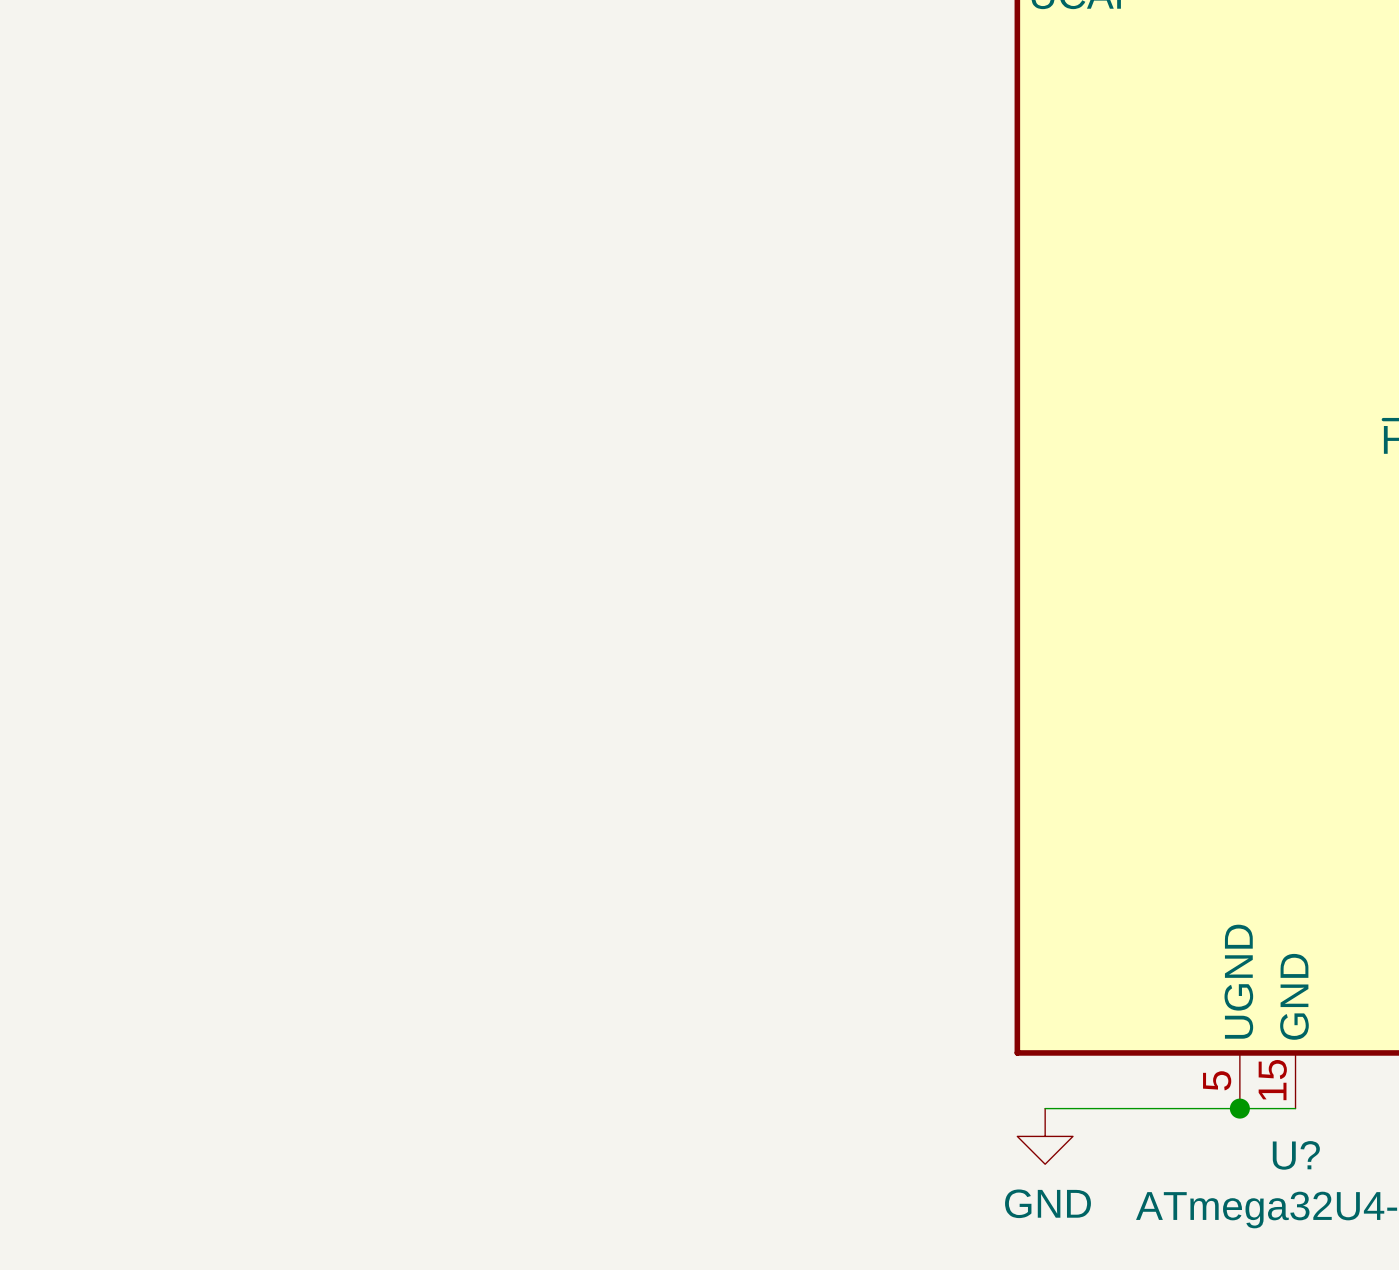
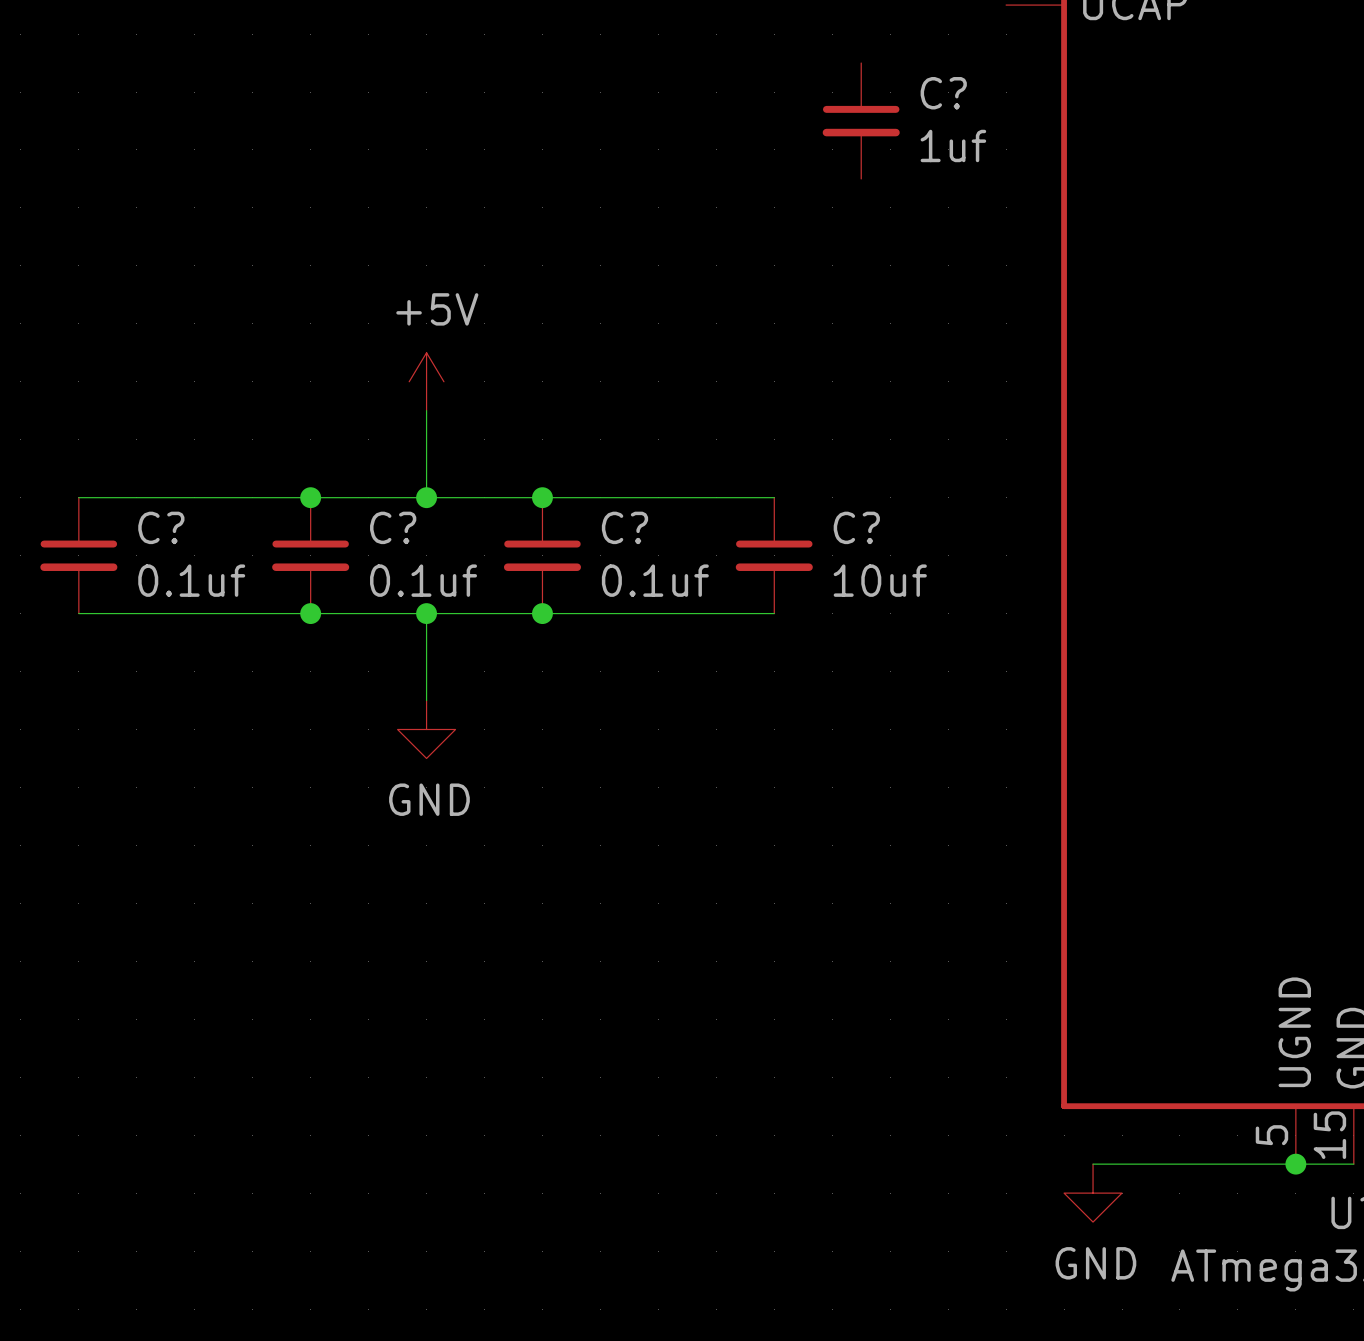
C?: none -> 1uf (861, 120)
power symbol: none -> +5V (426, 381)
wire: none -> (426, 410) (426, 497)
wire: none -> (78, 497) (774, 497)
junction: none -> (310, 497)
junction: none -> (426, 497)
junction: none -> (542, 497)
C?: none -> 0.1uf (78, 555)
C?: none -> 0.1uf (310, 555)
C?: none -> 0.1uf (542, 555)
C?: none -> 10uf (774, 555)
wire: none -> (78, 613) (774, 613)
junction: none -> (310, 613)
wire: none -> (426, 613) (426, 700)
junction: none -> (426, 613)
junction: none -> (542, 613)
power symbol: none -> GND (426, 729)

